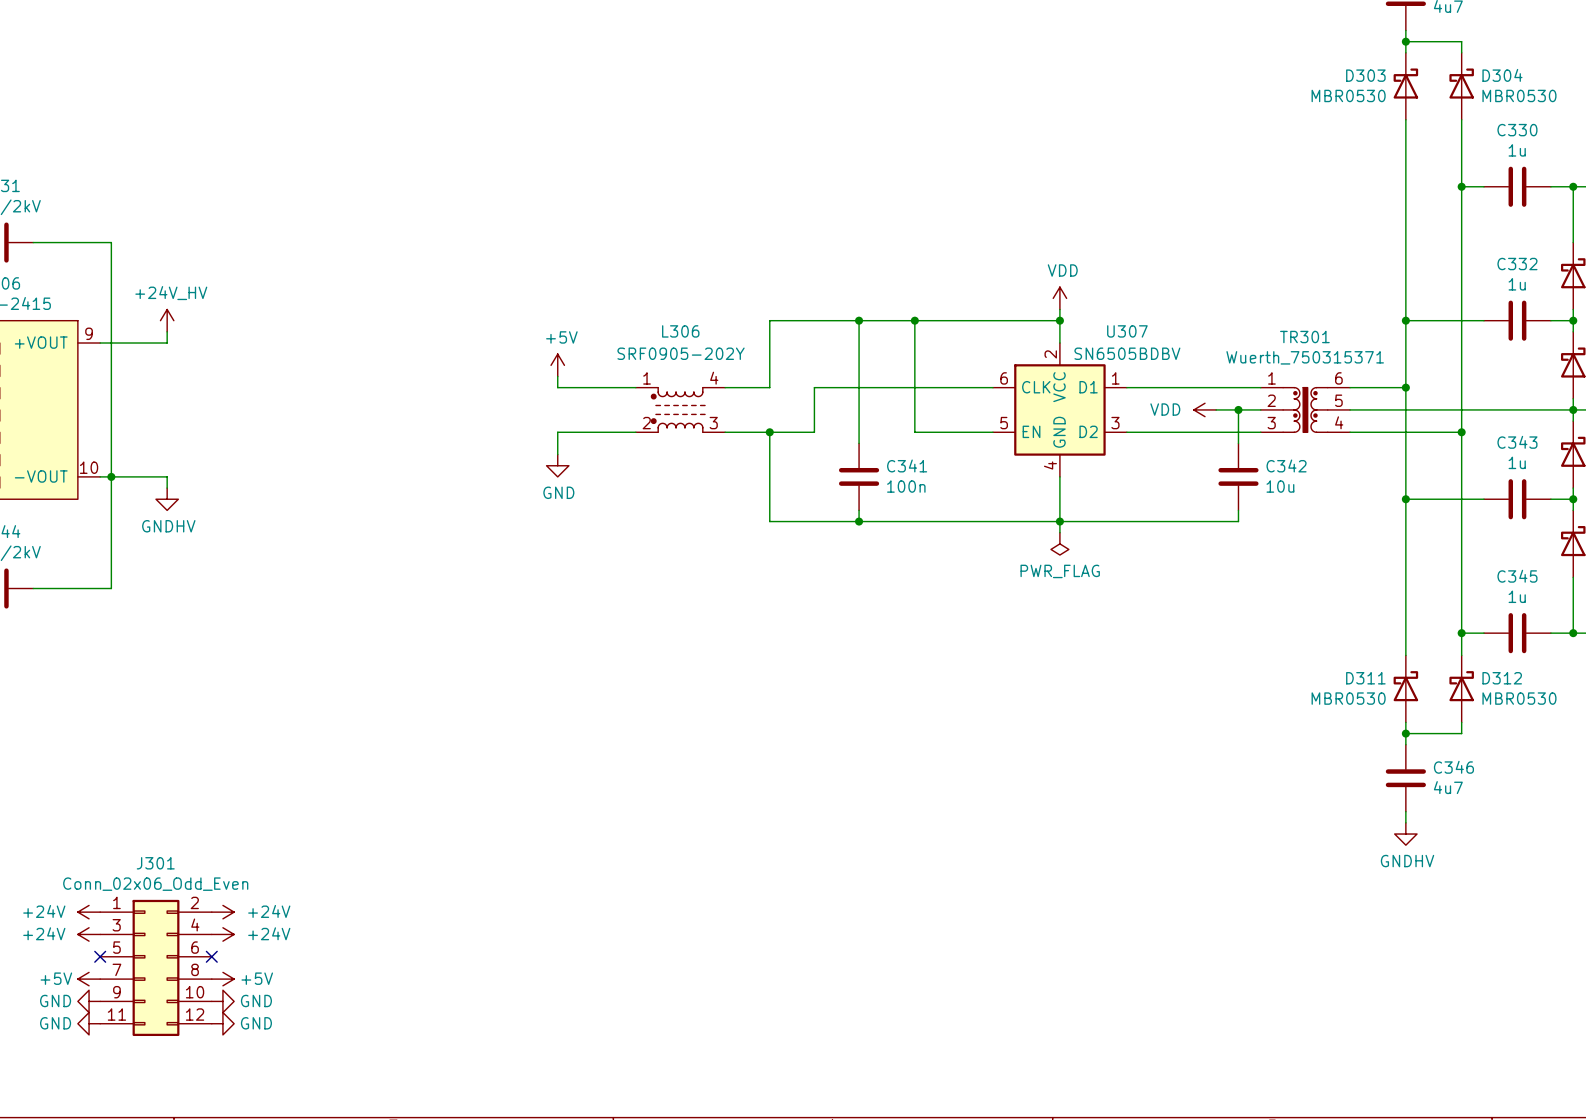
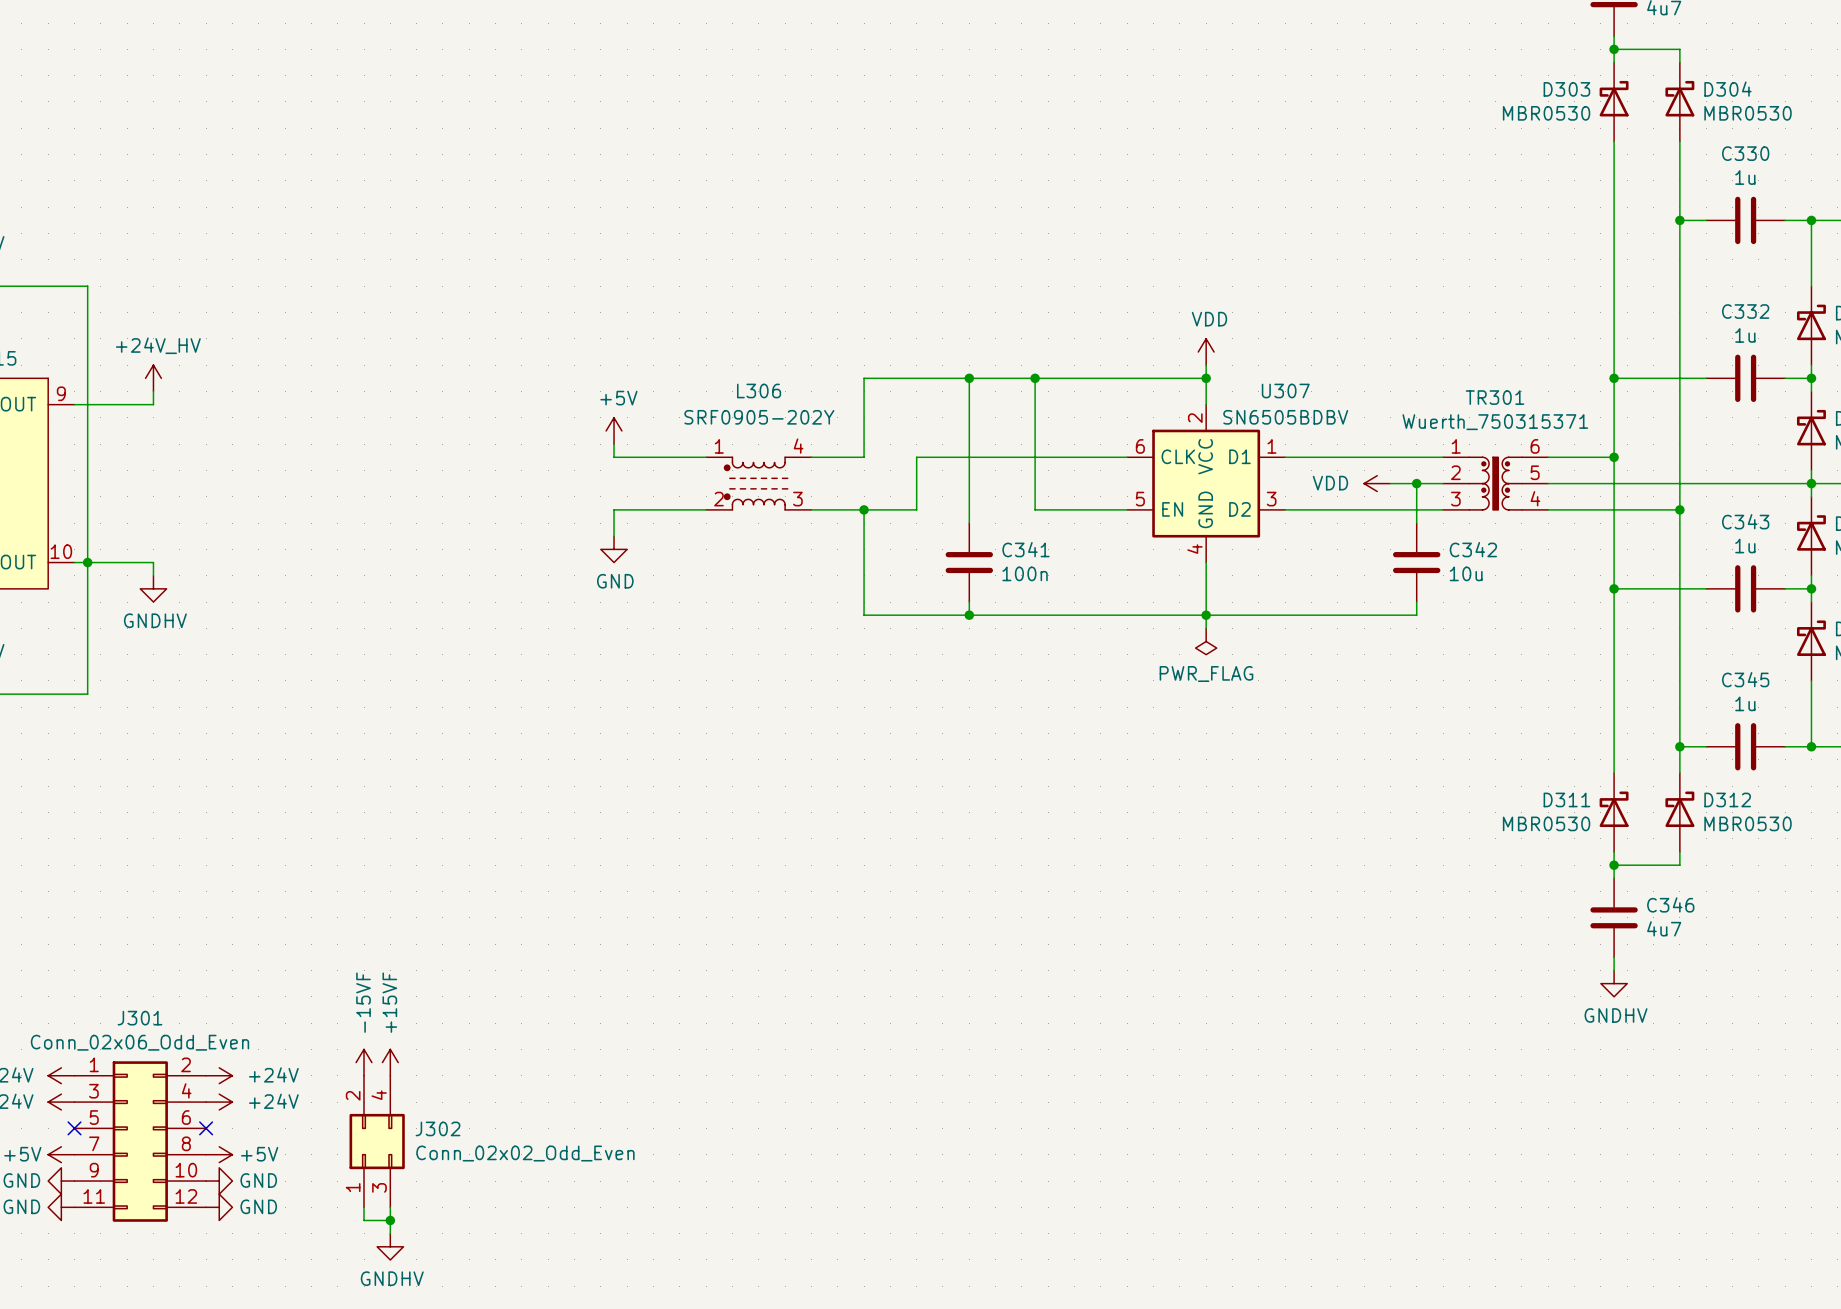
power symbol: none -> -15VF (364, 1062)
power symbol: none -> +15VF (390, 1062)
J302: none -> Conn_02x02_Odd_Even (377, 1141)
wire: none -> (364, 1207) (364, 1220) (390, 1220)
wire: none -> (390, 1207) (390, 1233)
junction: none -> (390, 1220)
power symbol: none -> GNDHV (390, 1246)

